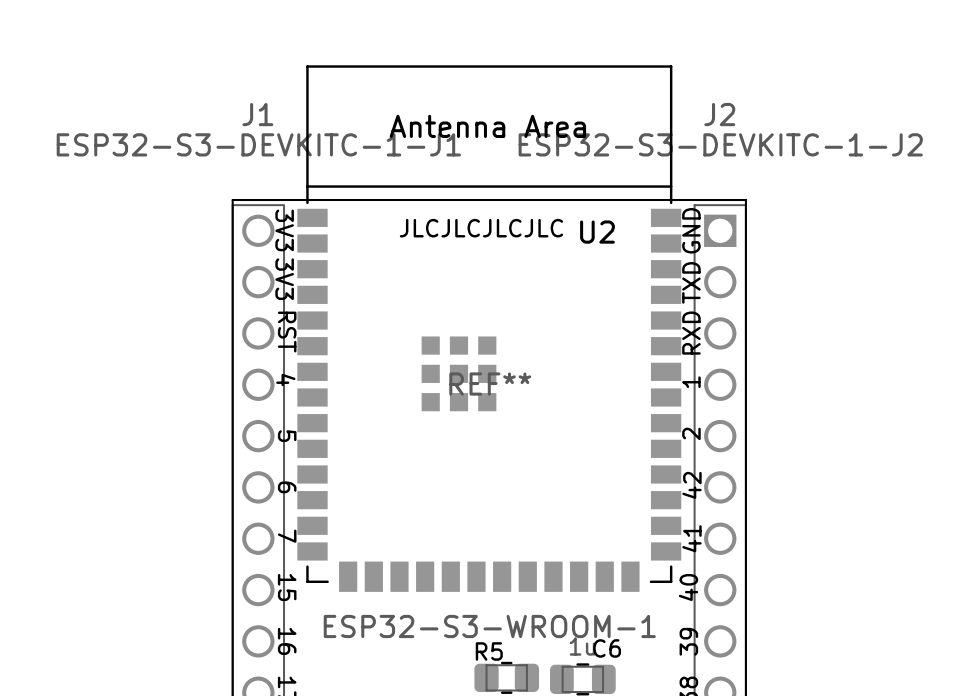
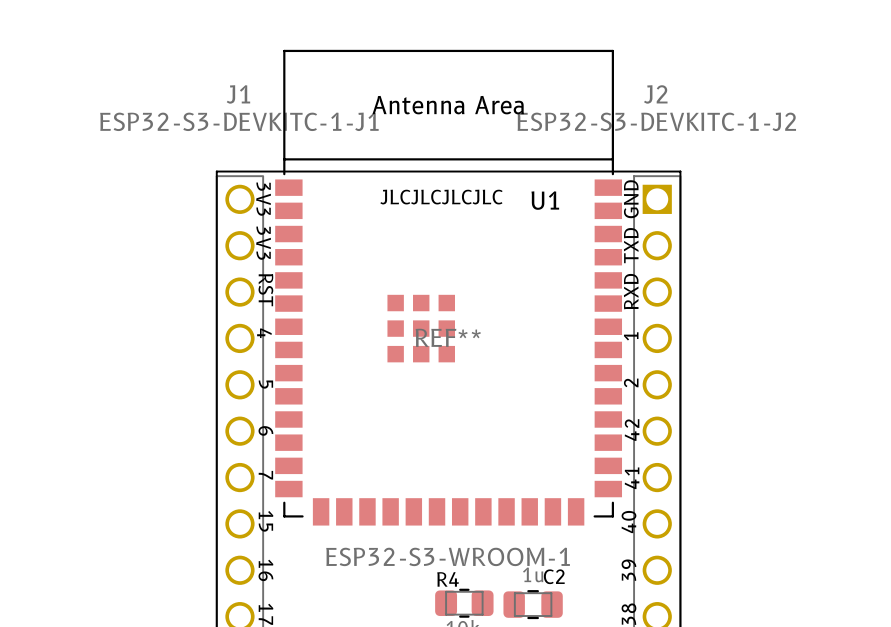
U2 name: U2 (597, 232) -> U1 (545, 200)
C6 name: C6 (607, 648) -> C2 (554, 576)
R5 name: R5 (489, 651) -> R4 (448, 579)

